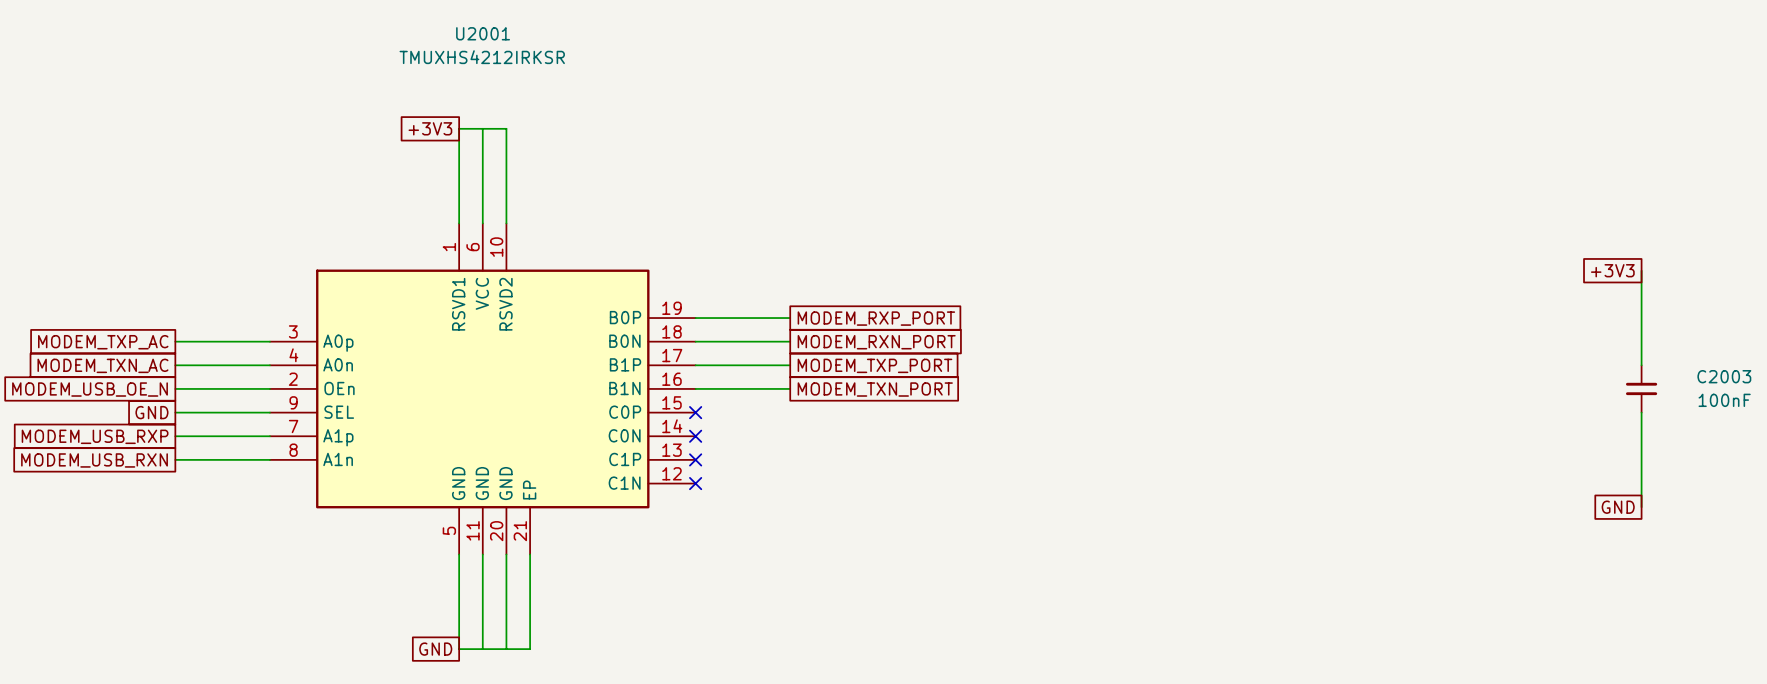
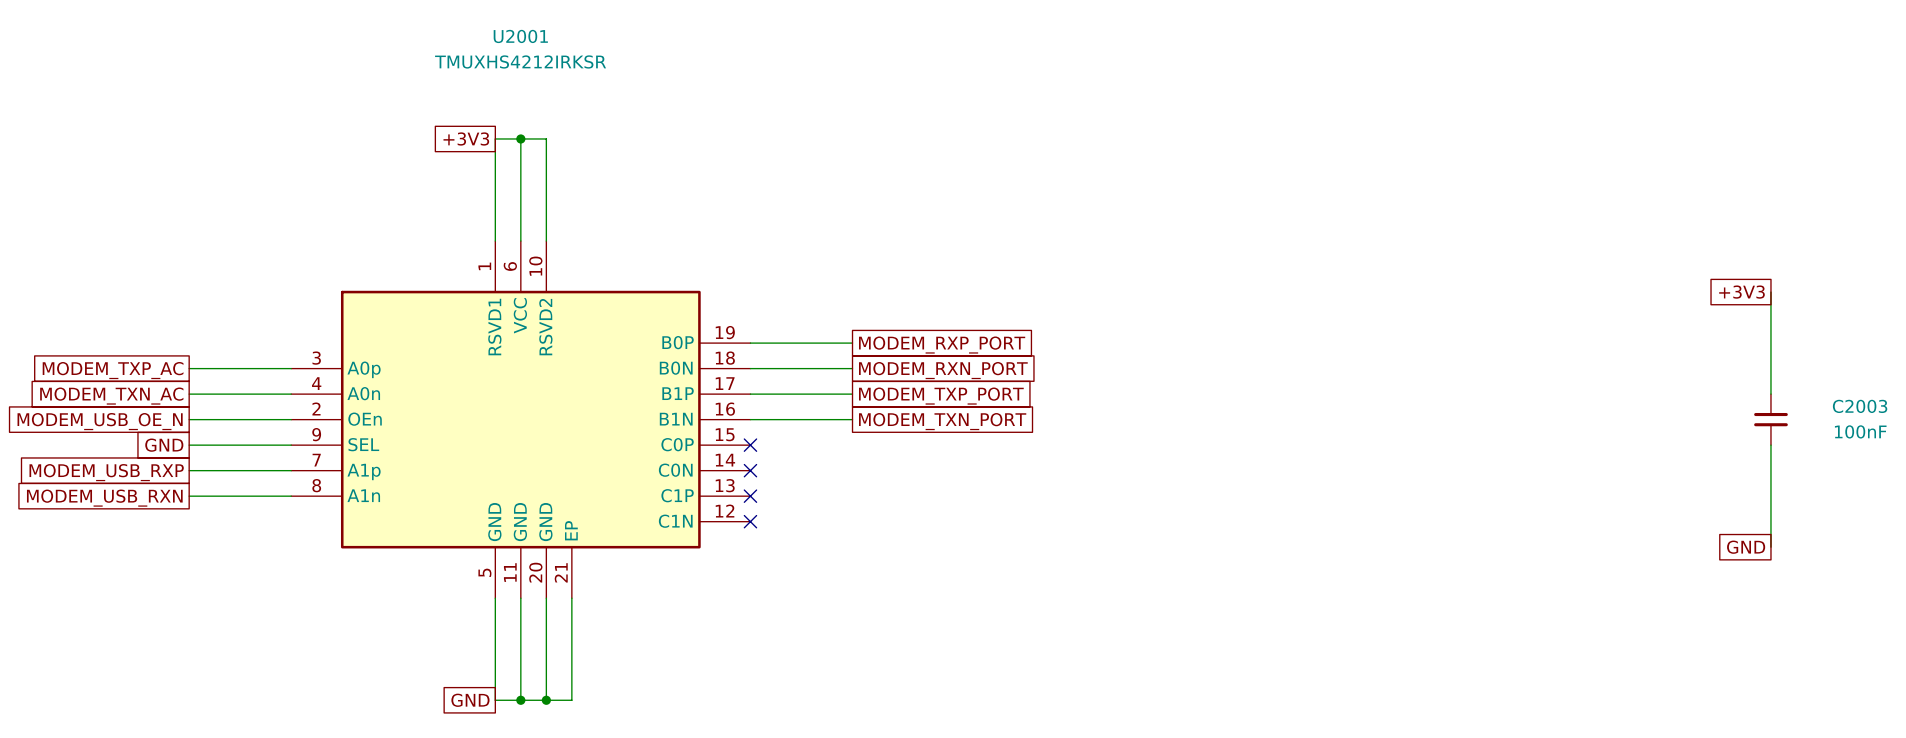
junction: none -> (520, 138)
junction: none -> (520, 700)
junction: none -> (546, 700)

